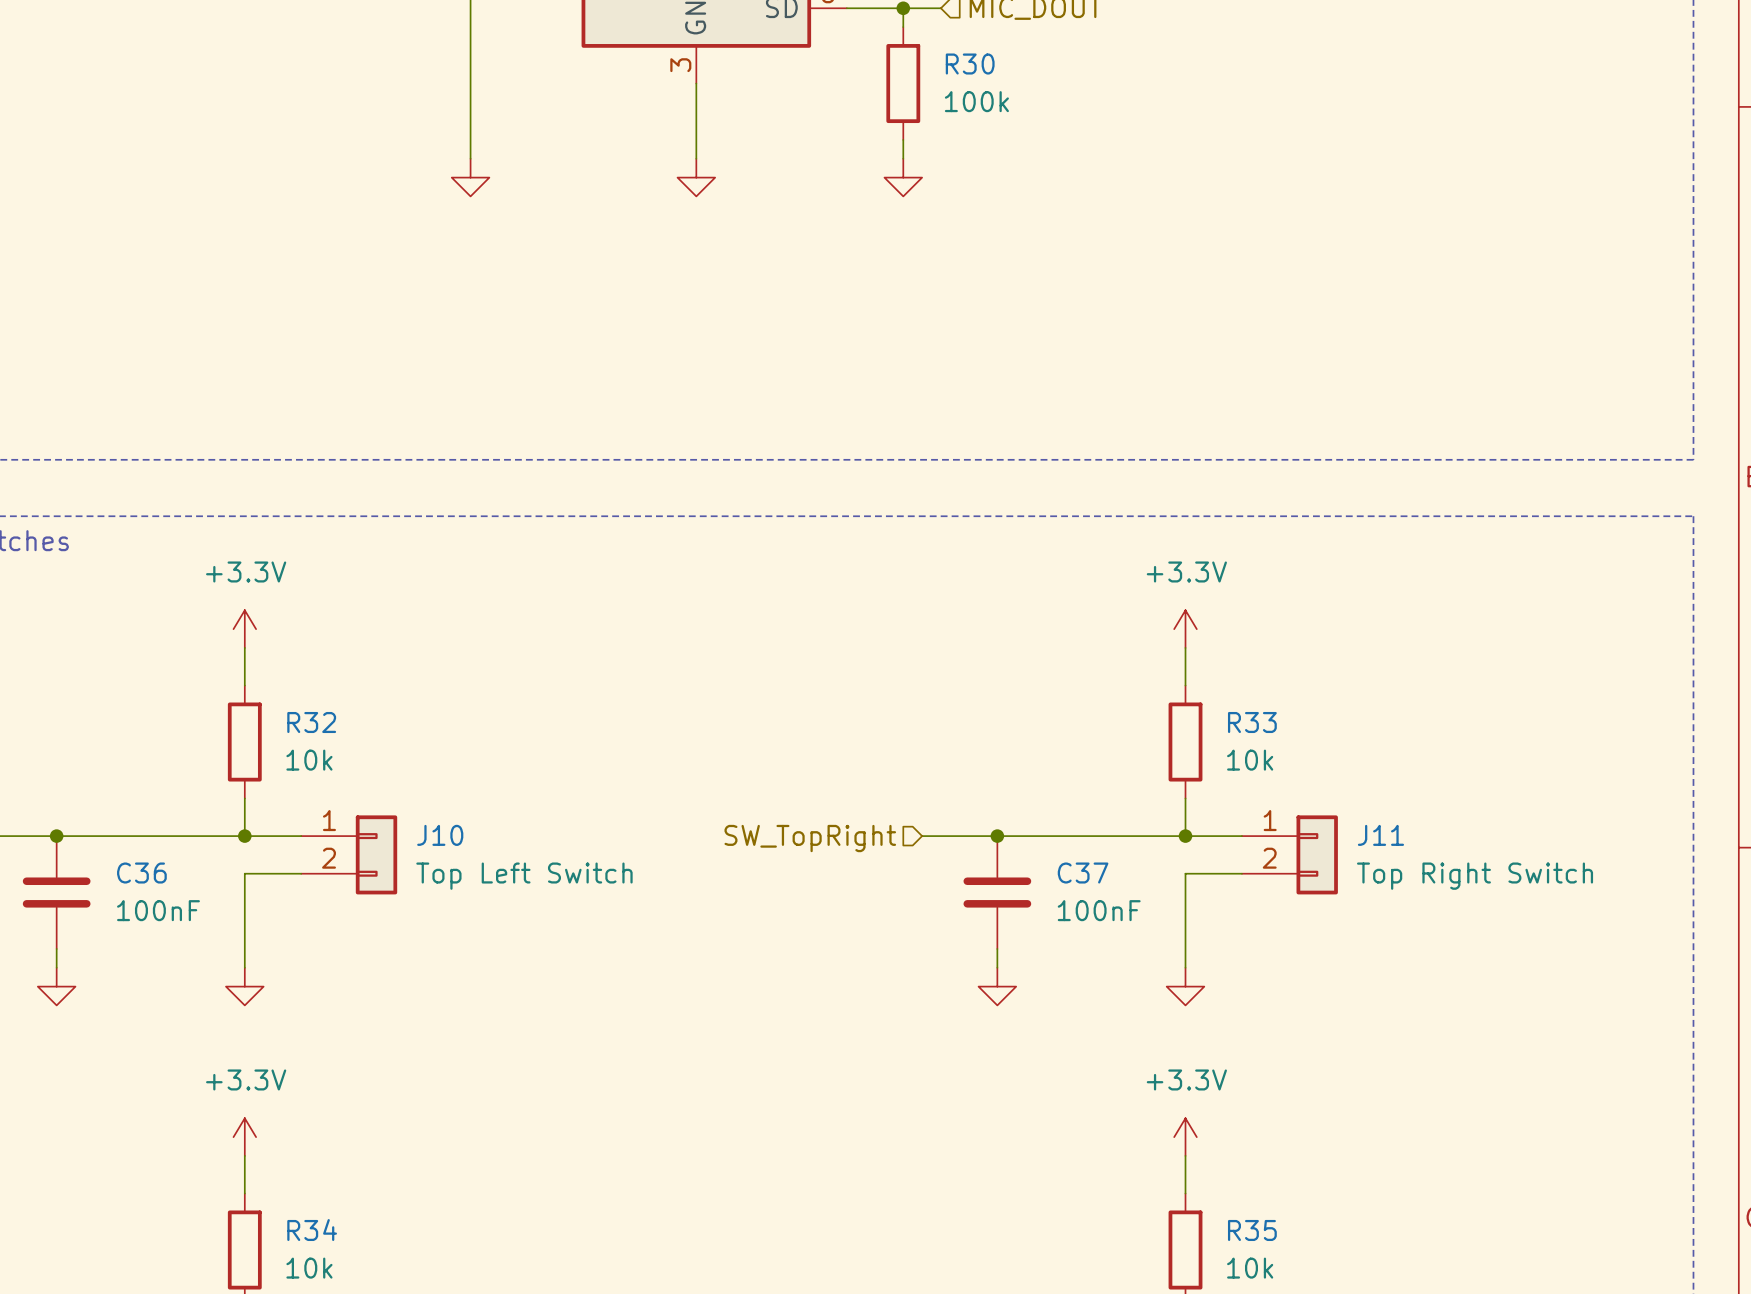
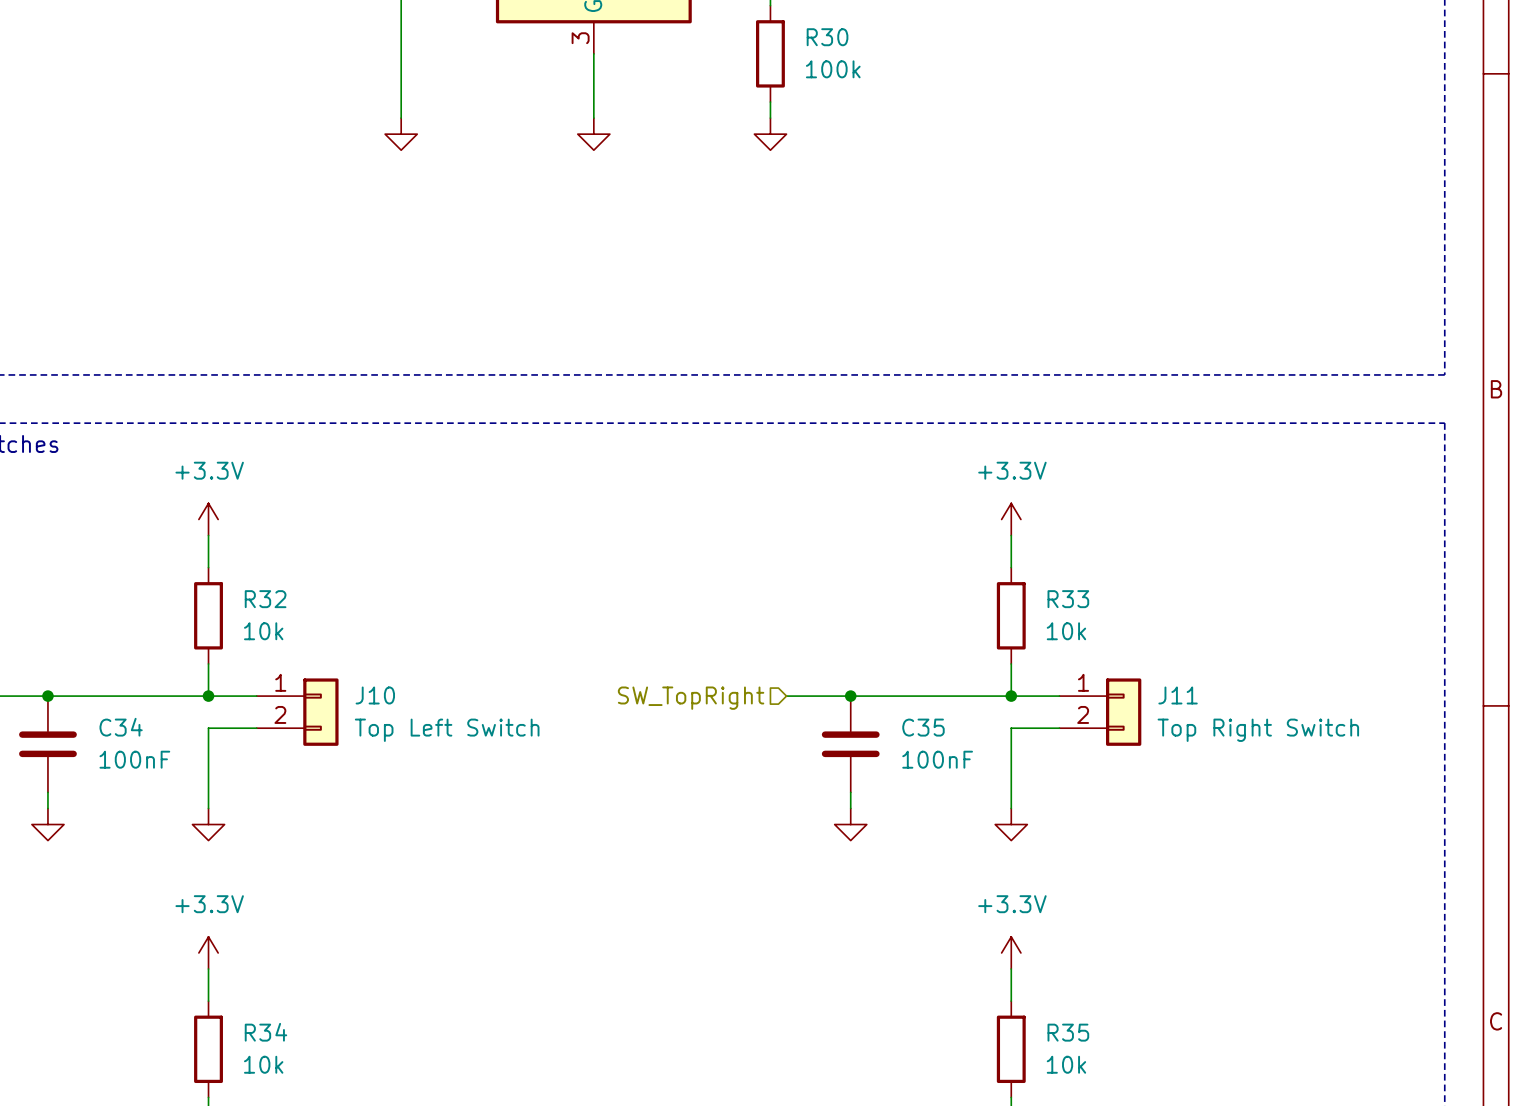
C36 name: C36 (141, 873) -> C34 (121, 727)
C37 name: C37 (1083, 873) -> C35 (923, 727)

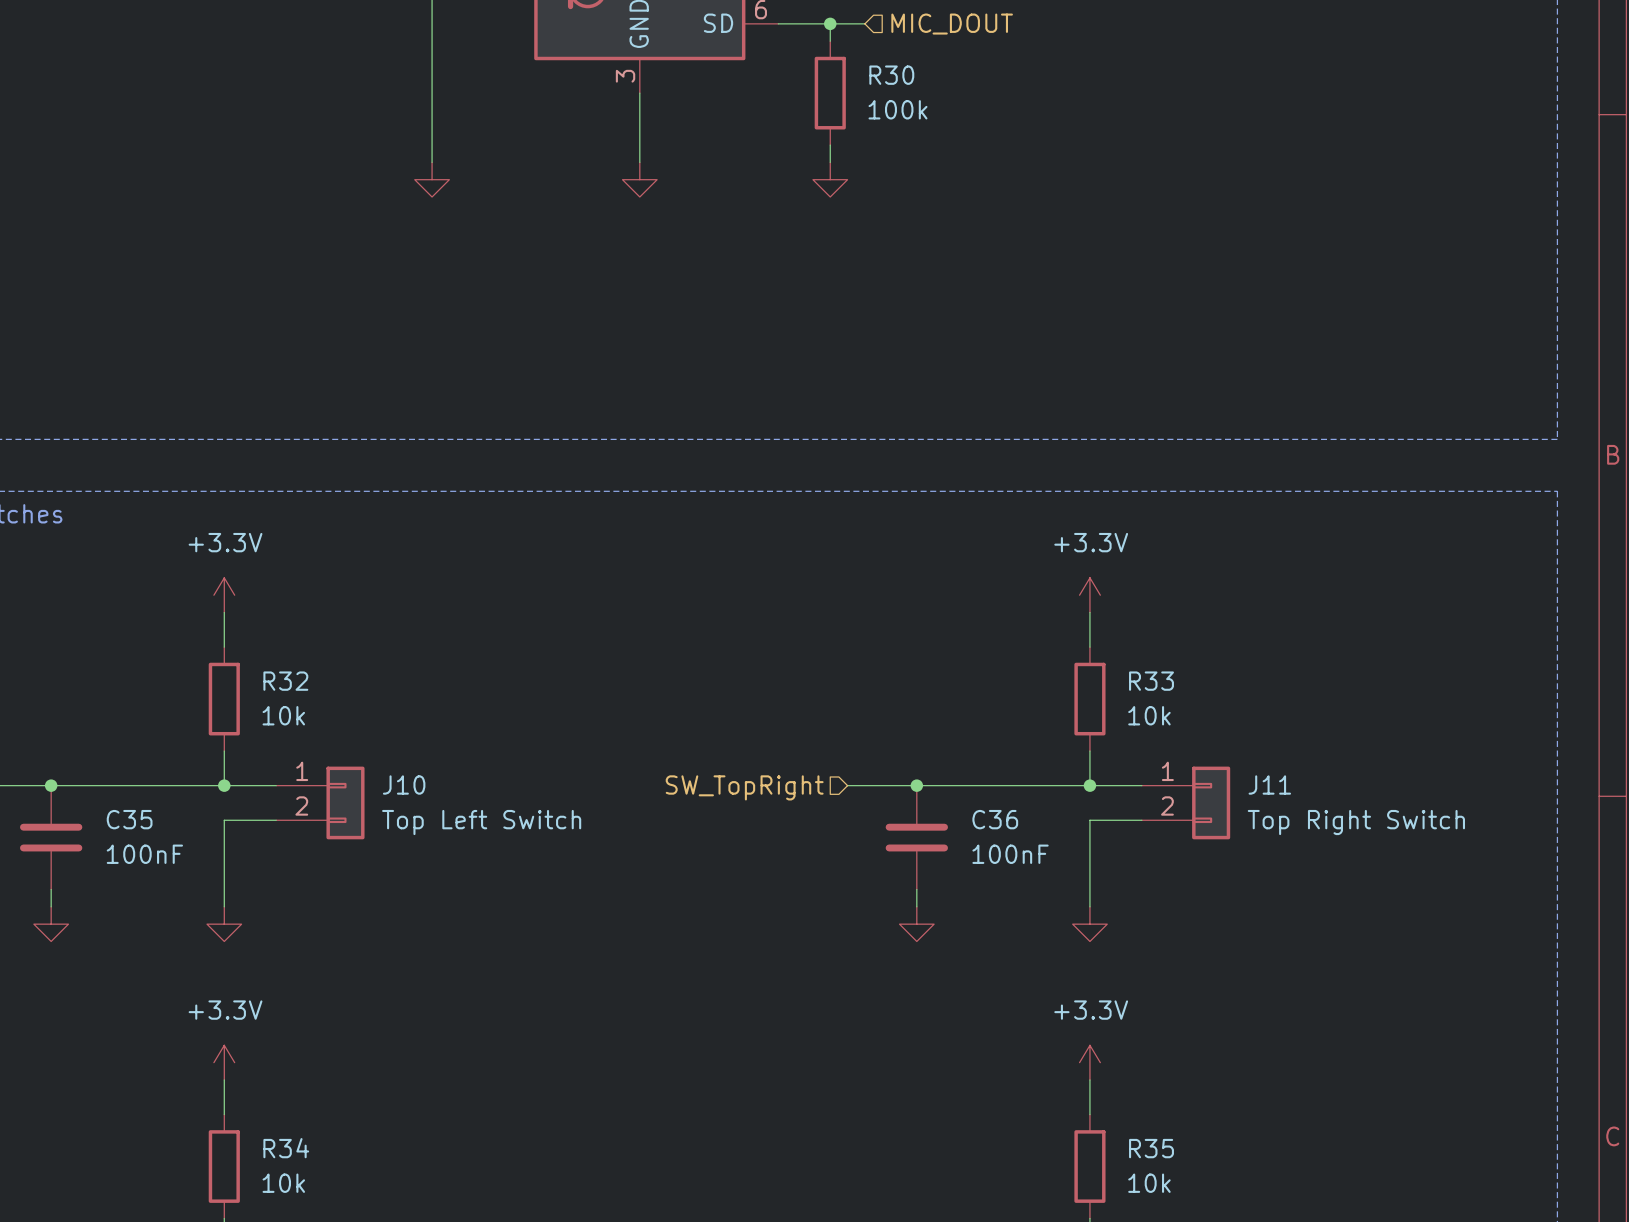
C34 name: C34 (121, 727) -> C35 (129, 819)
C35 name: C35 (923, 727) -> C36 (995, 819)

